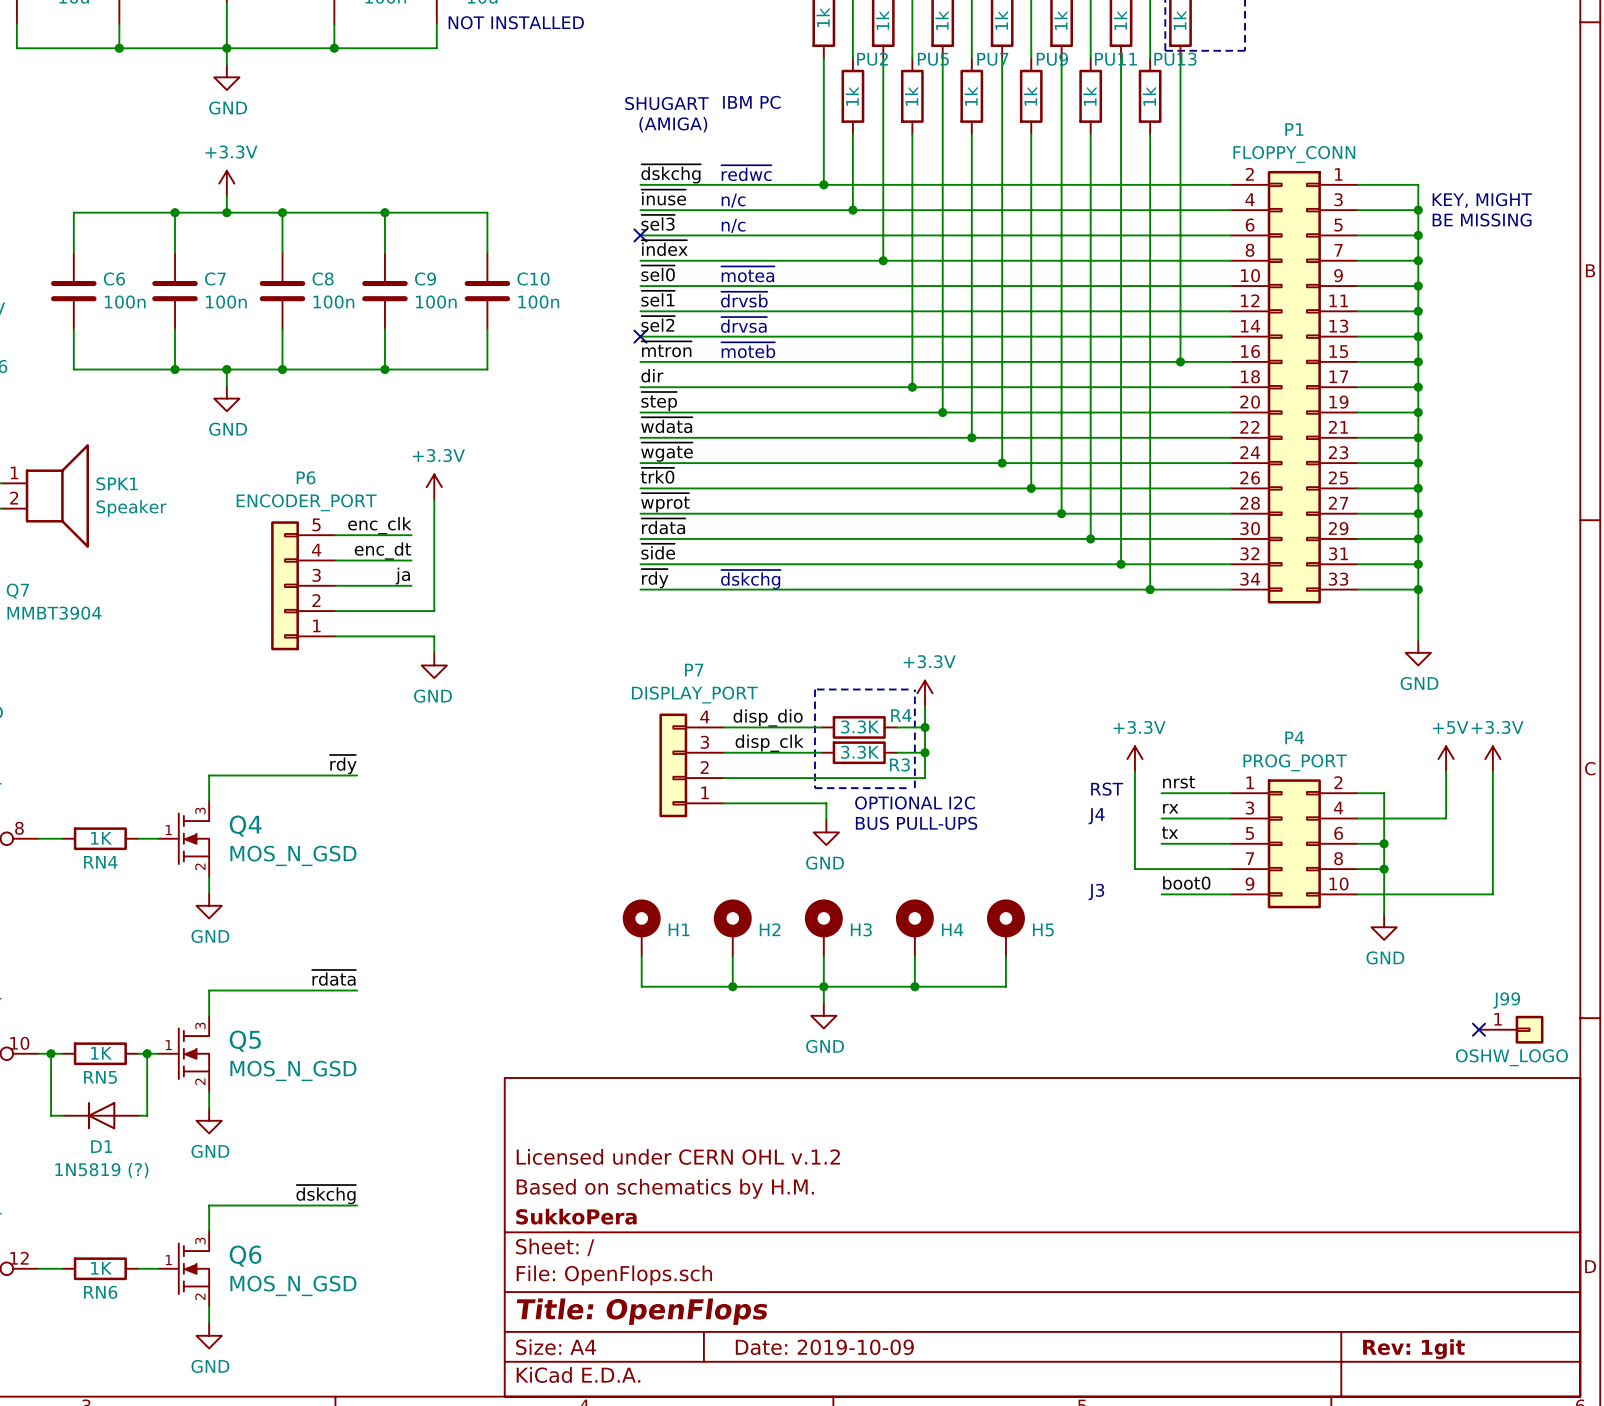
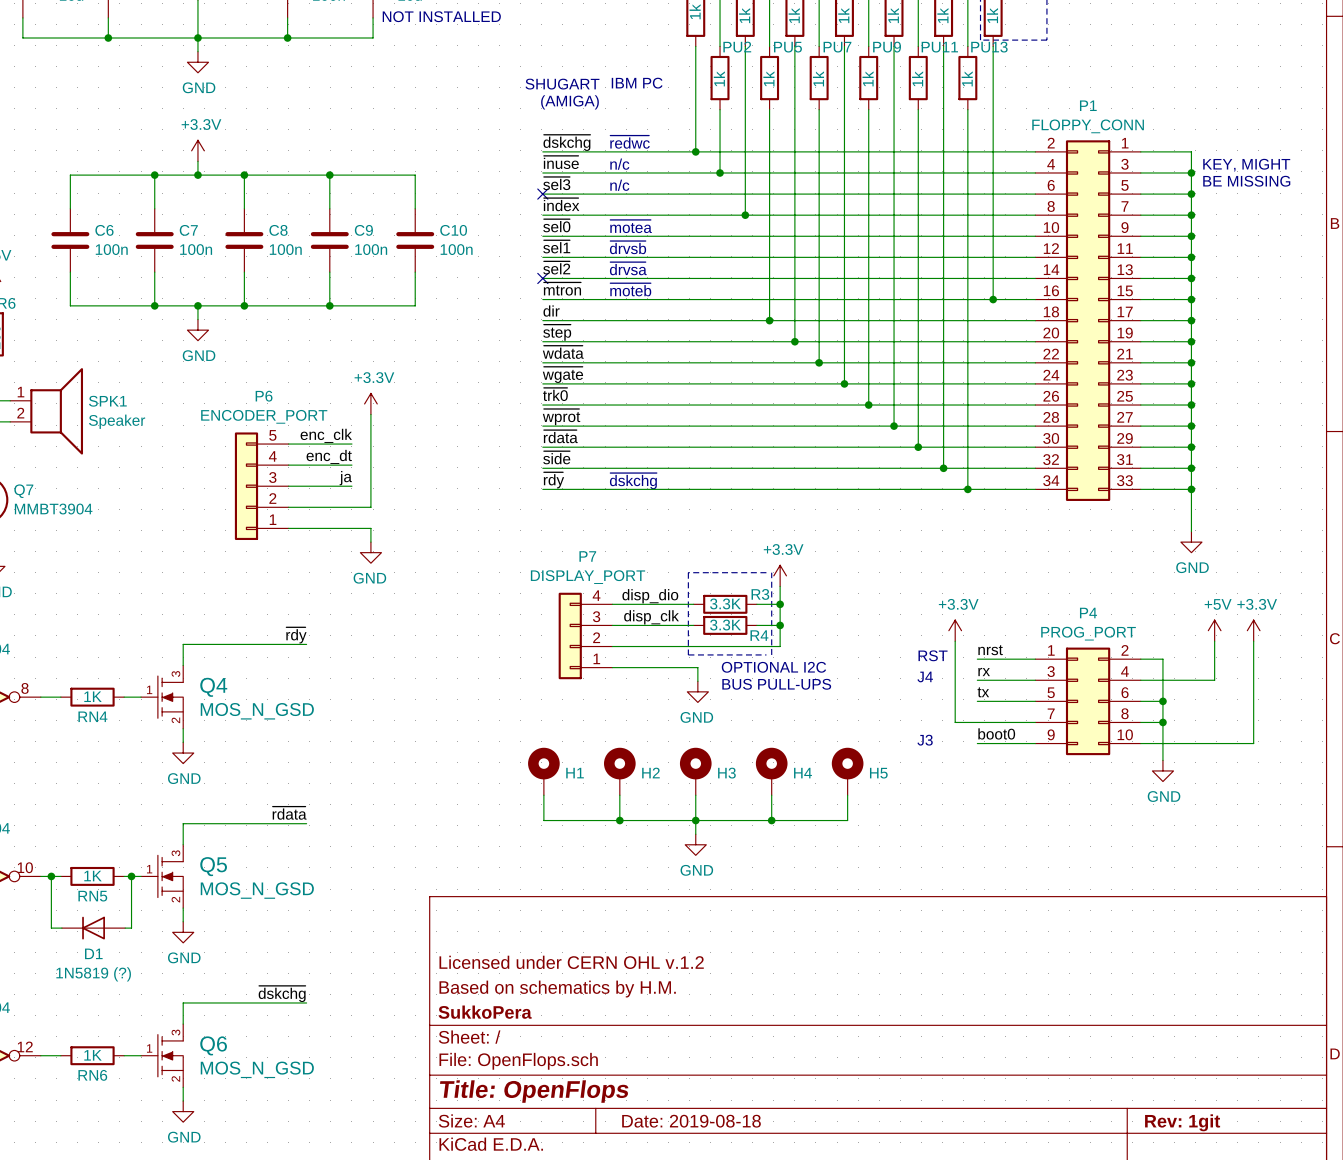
R4 name: R4 (901, 715) -> R3 (760, 594)
R3 name: R3 (899, 764) -> R4 (759, 635)
no-connect mark: (1478, 1029) -> none
J99: OSHW_LOGO (1511, 1029) -> none
title block: Date: 2019-10-09 (824, 1347) -> Date: 2019-08-18 (691, 1121)

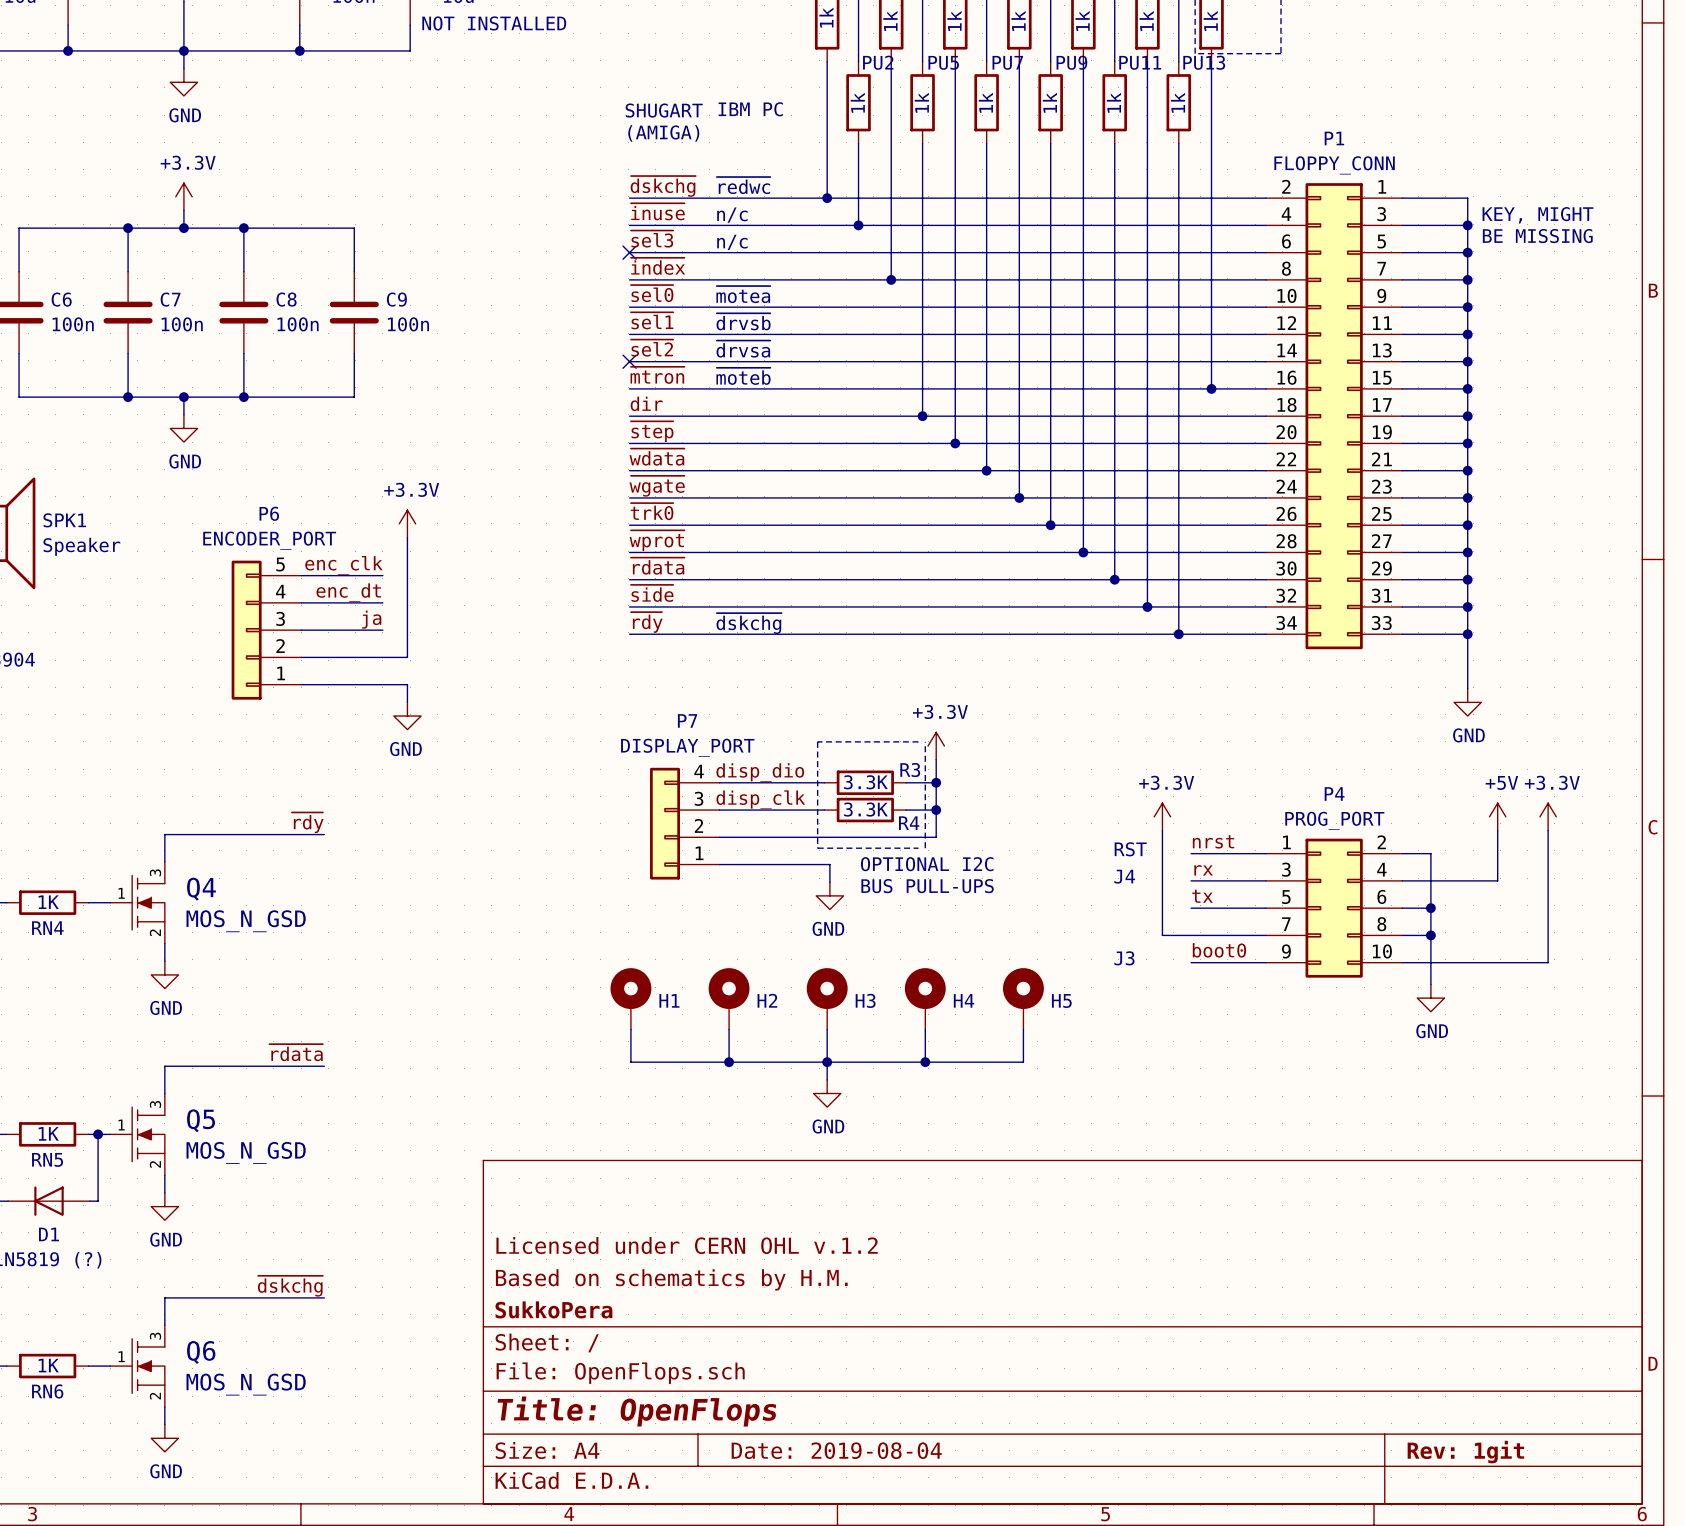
wire: (329, 175) (415, 175) (415, 208) -> none
junction: (329, 175) -> none
C10: 100n (415, 240) -> none
wire: (415, 272) (415, 305) (329, 305) -> none
junction: (329, 305) -> none
title block: Date: 2019-08-18 (691, 1121) -> Date: 2019-08-04 (836, 1450)

